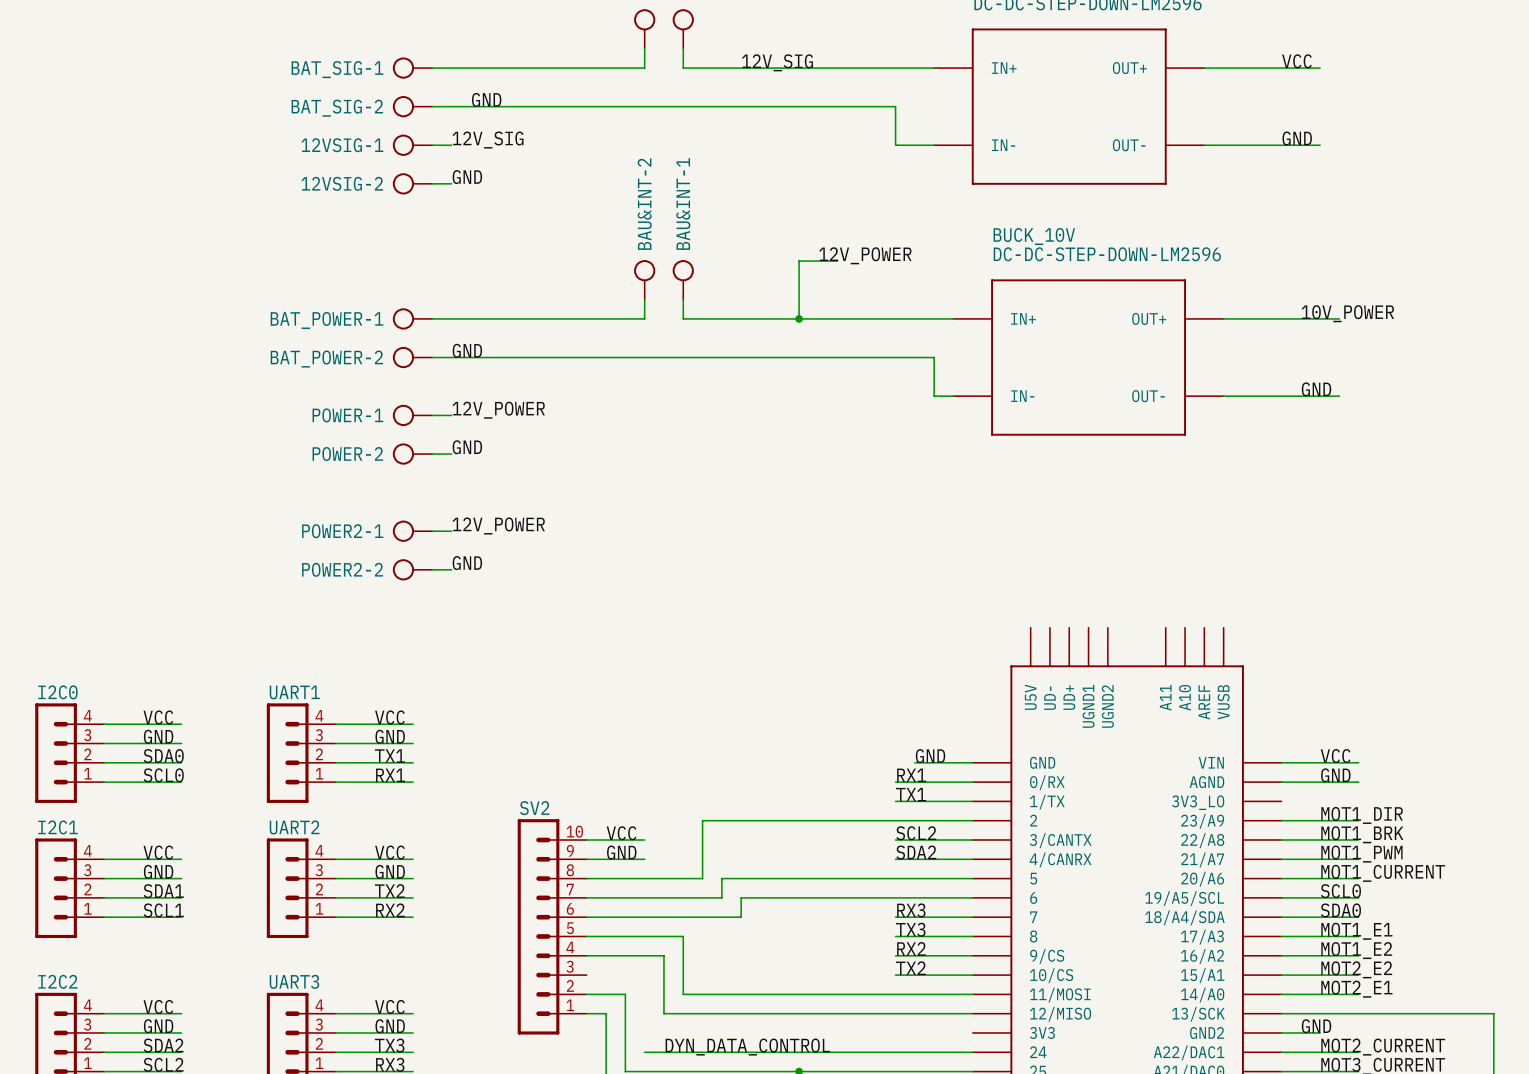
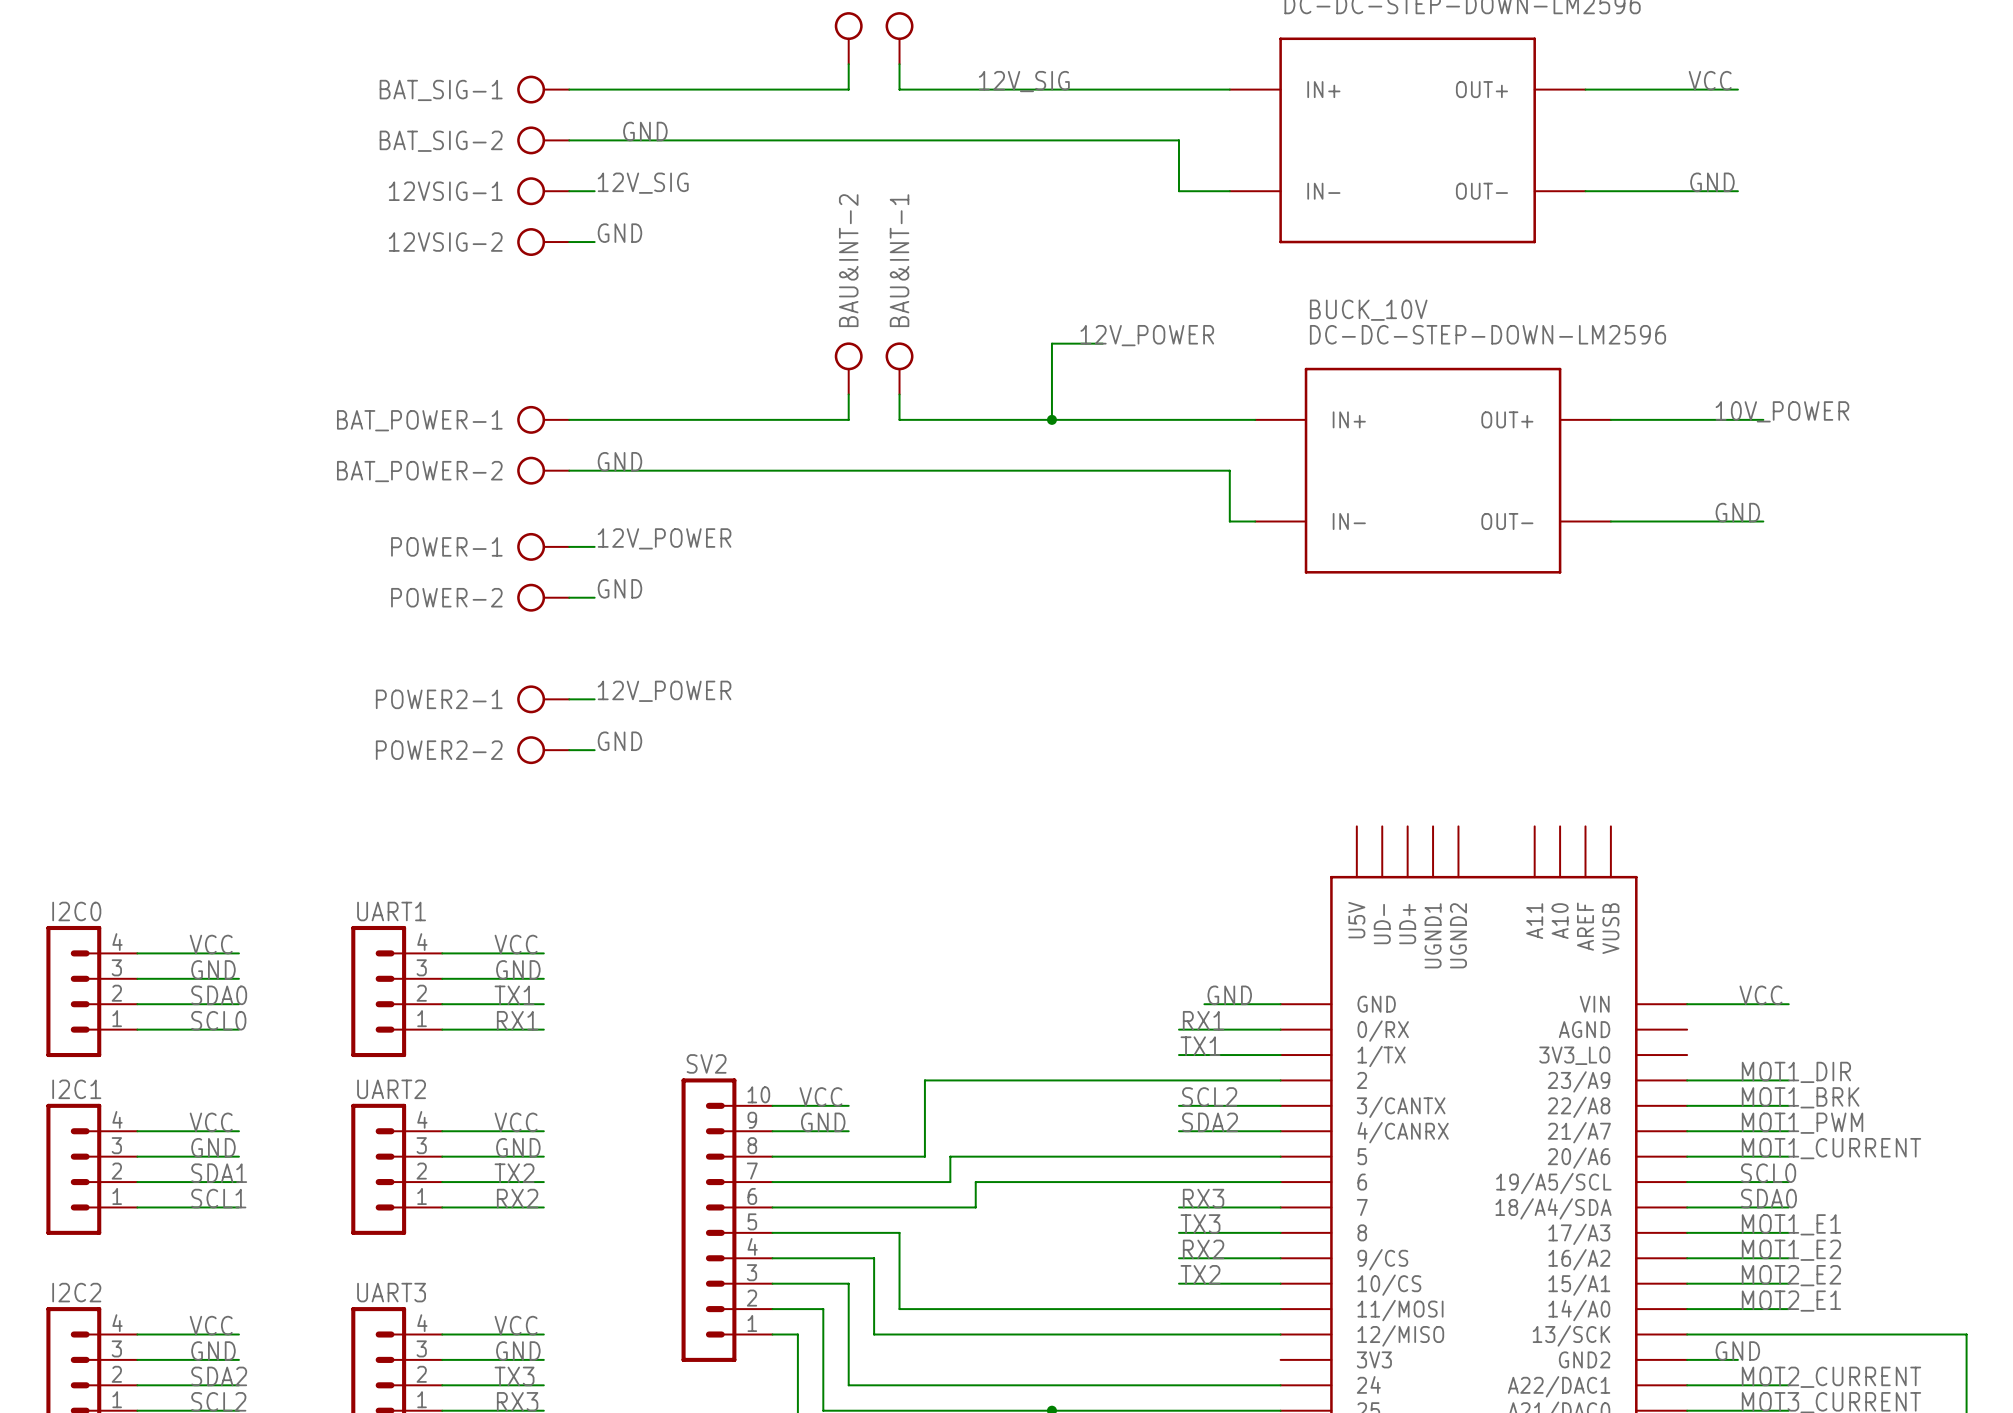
label: GND (1335, 775) -> none
wire: (1281, 782) (1358, 782) -> none
wire: none -> (772, 1283) (848, 1283) (848, 1385)
label: DYN_DATA_CONTROL (747, 1047) -> none

